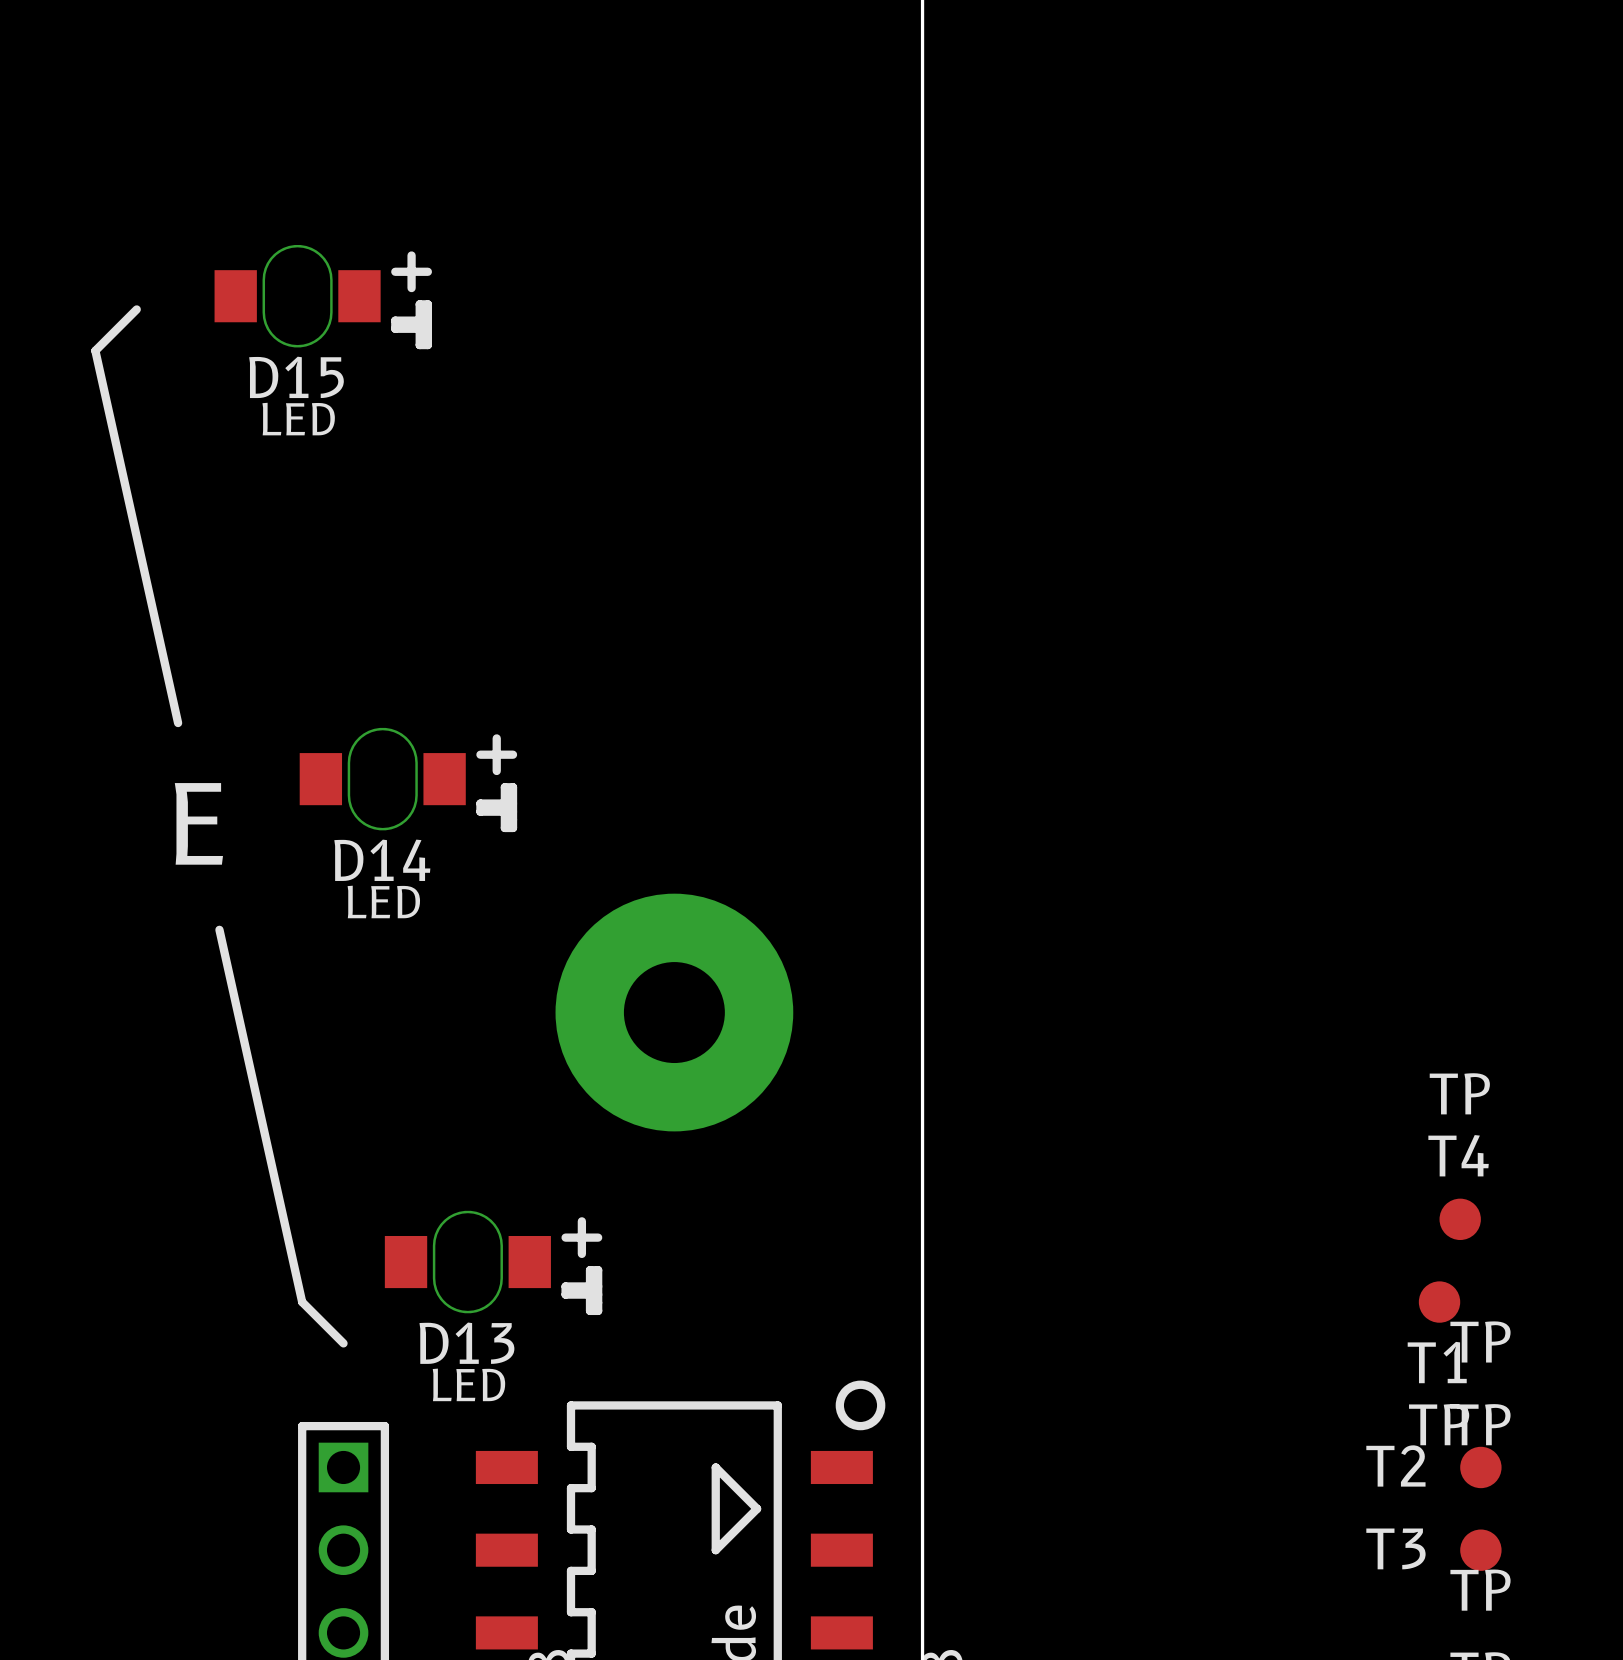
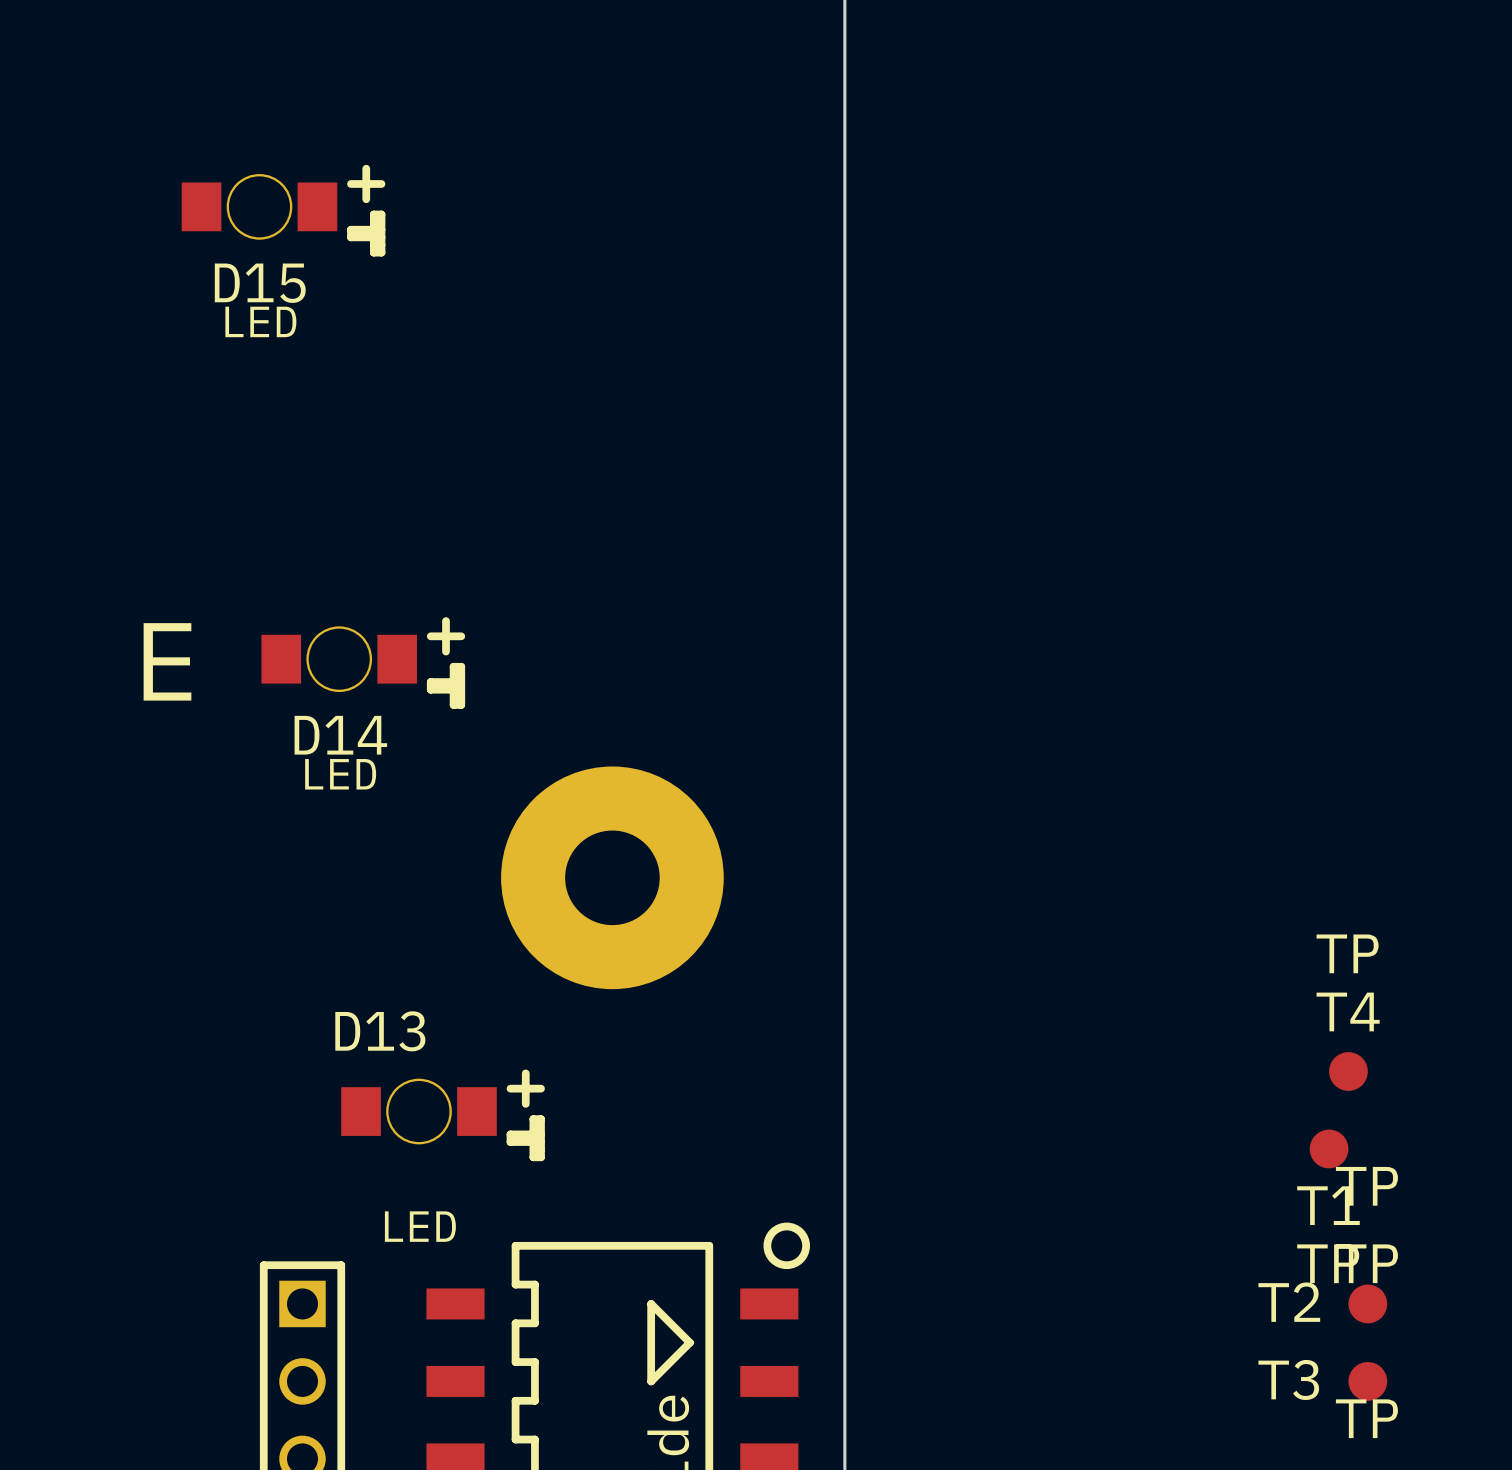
D15 footprint: [214, 244, 432, 350] -> [181, 164, 386, 257]
line: (136, 309) (95, 350) (178, 723) -> none
D14 footprint: [299, 727, 518, 833] -> [261, 617, 466, 709]
text position: E (198, 823) -> E (167, 661)
line: (219, 929) (302, 1302) (343, 1343) -> none
D13 footprint: [384, 1210, 603, 1316] -> [341, 1069, 545, 1162]
D13 name position: D13 (466, 1343) -> D13 (380, 1031)

